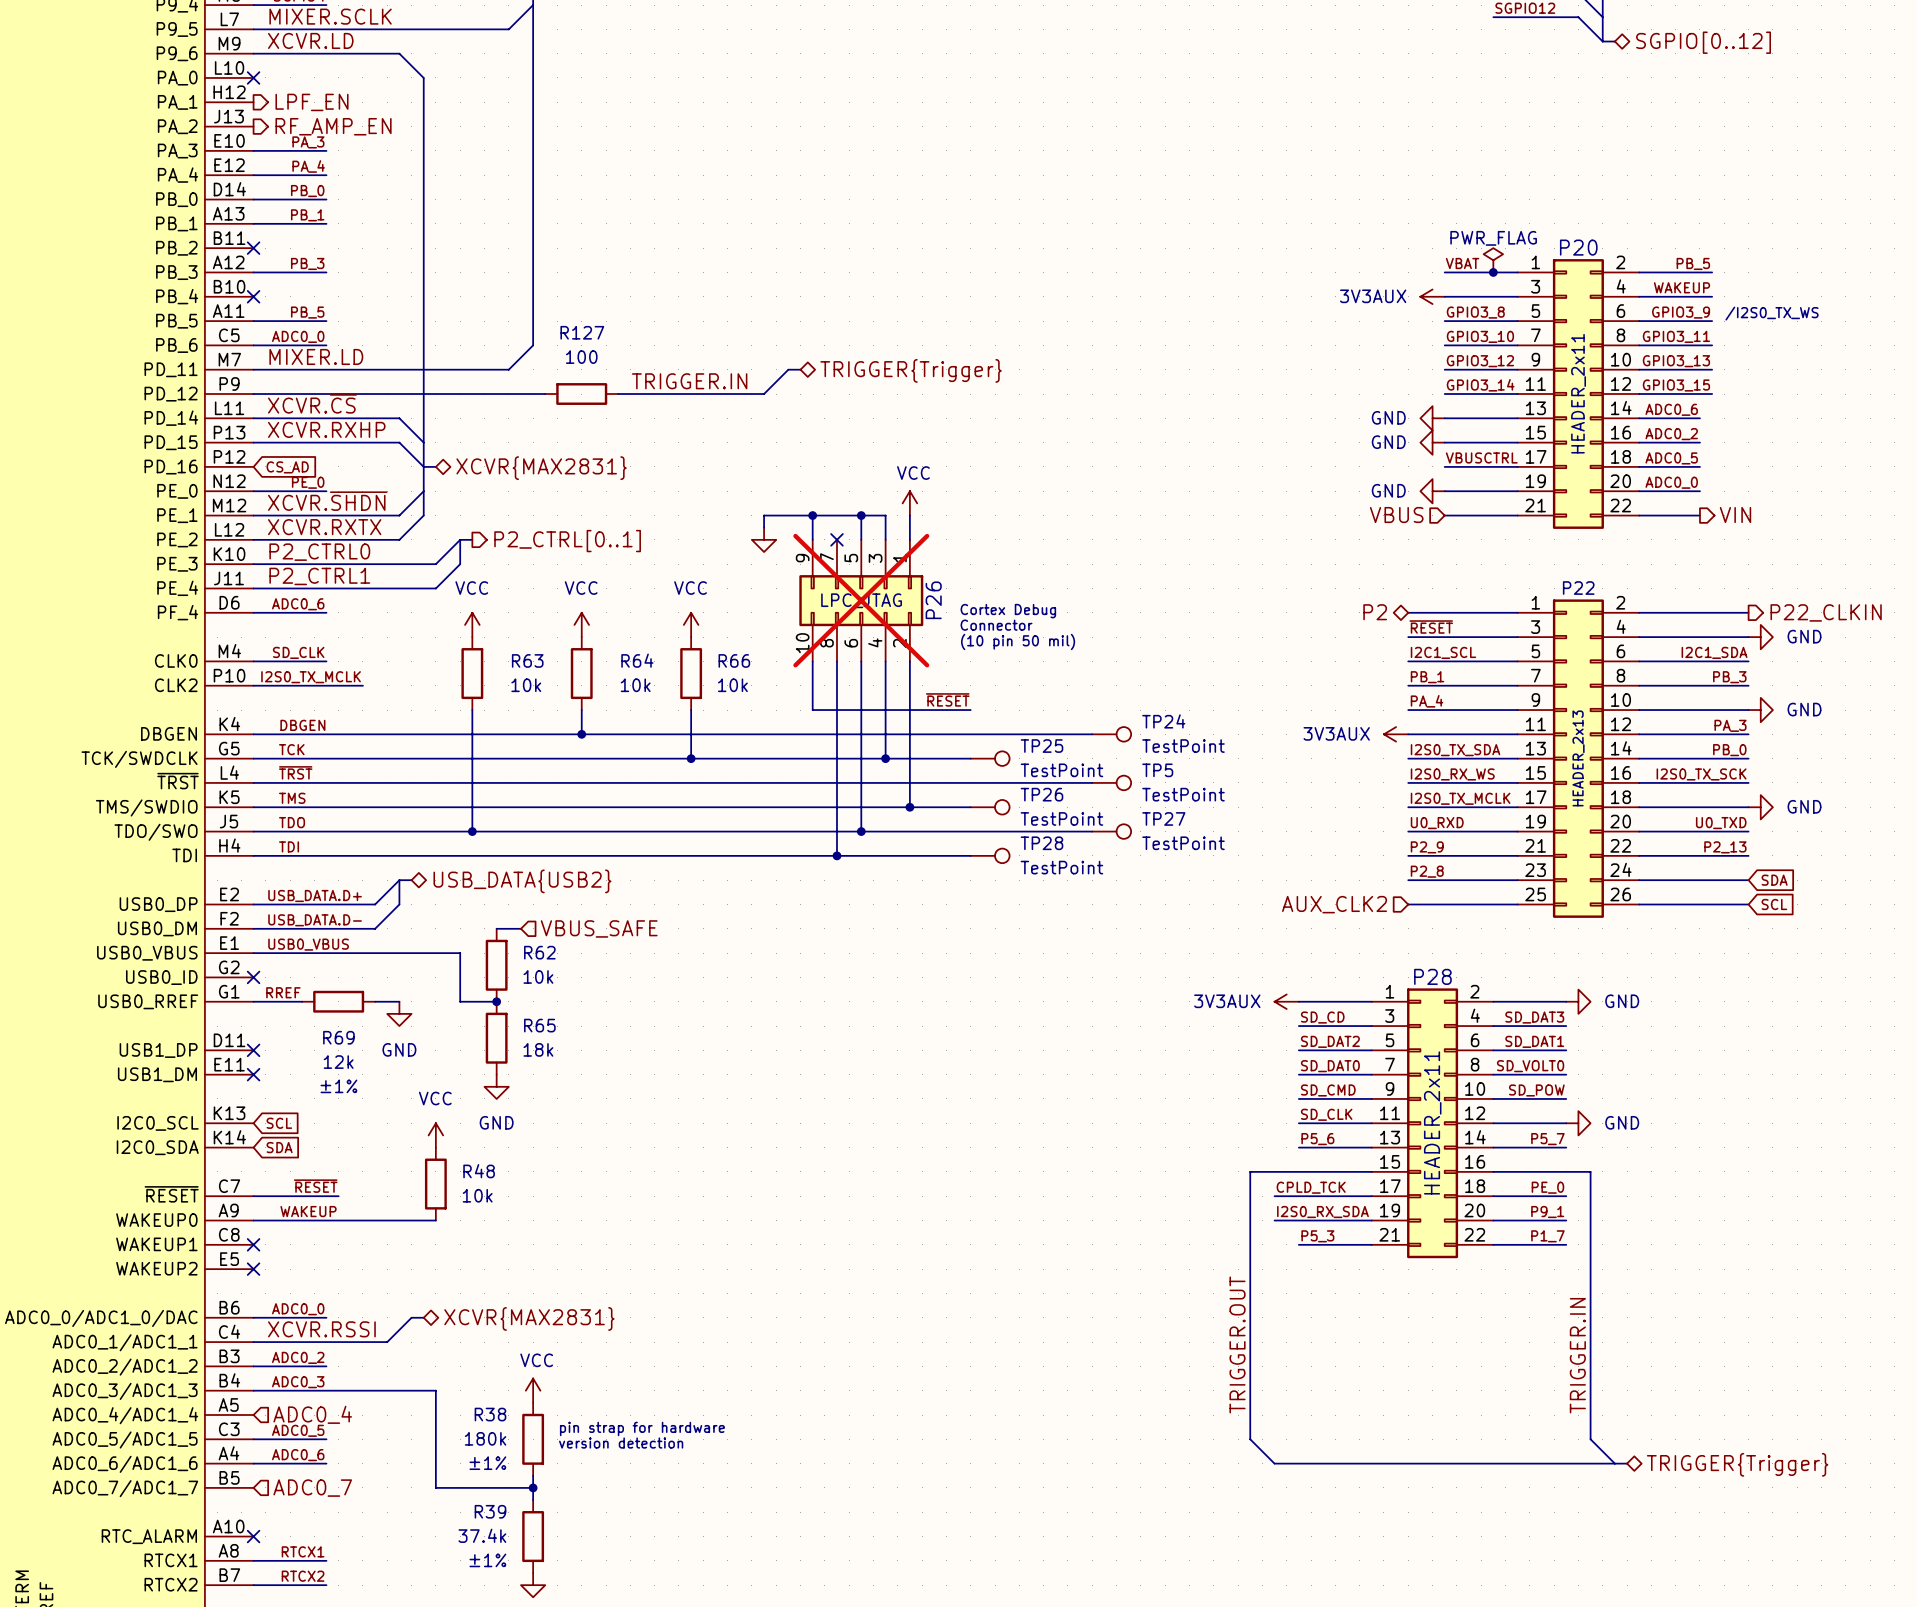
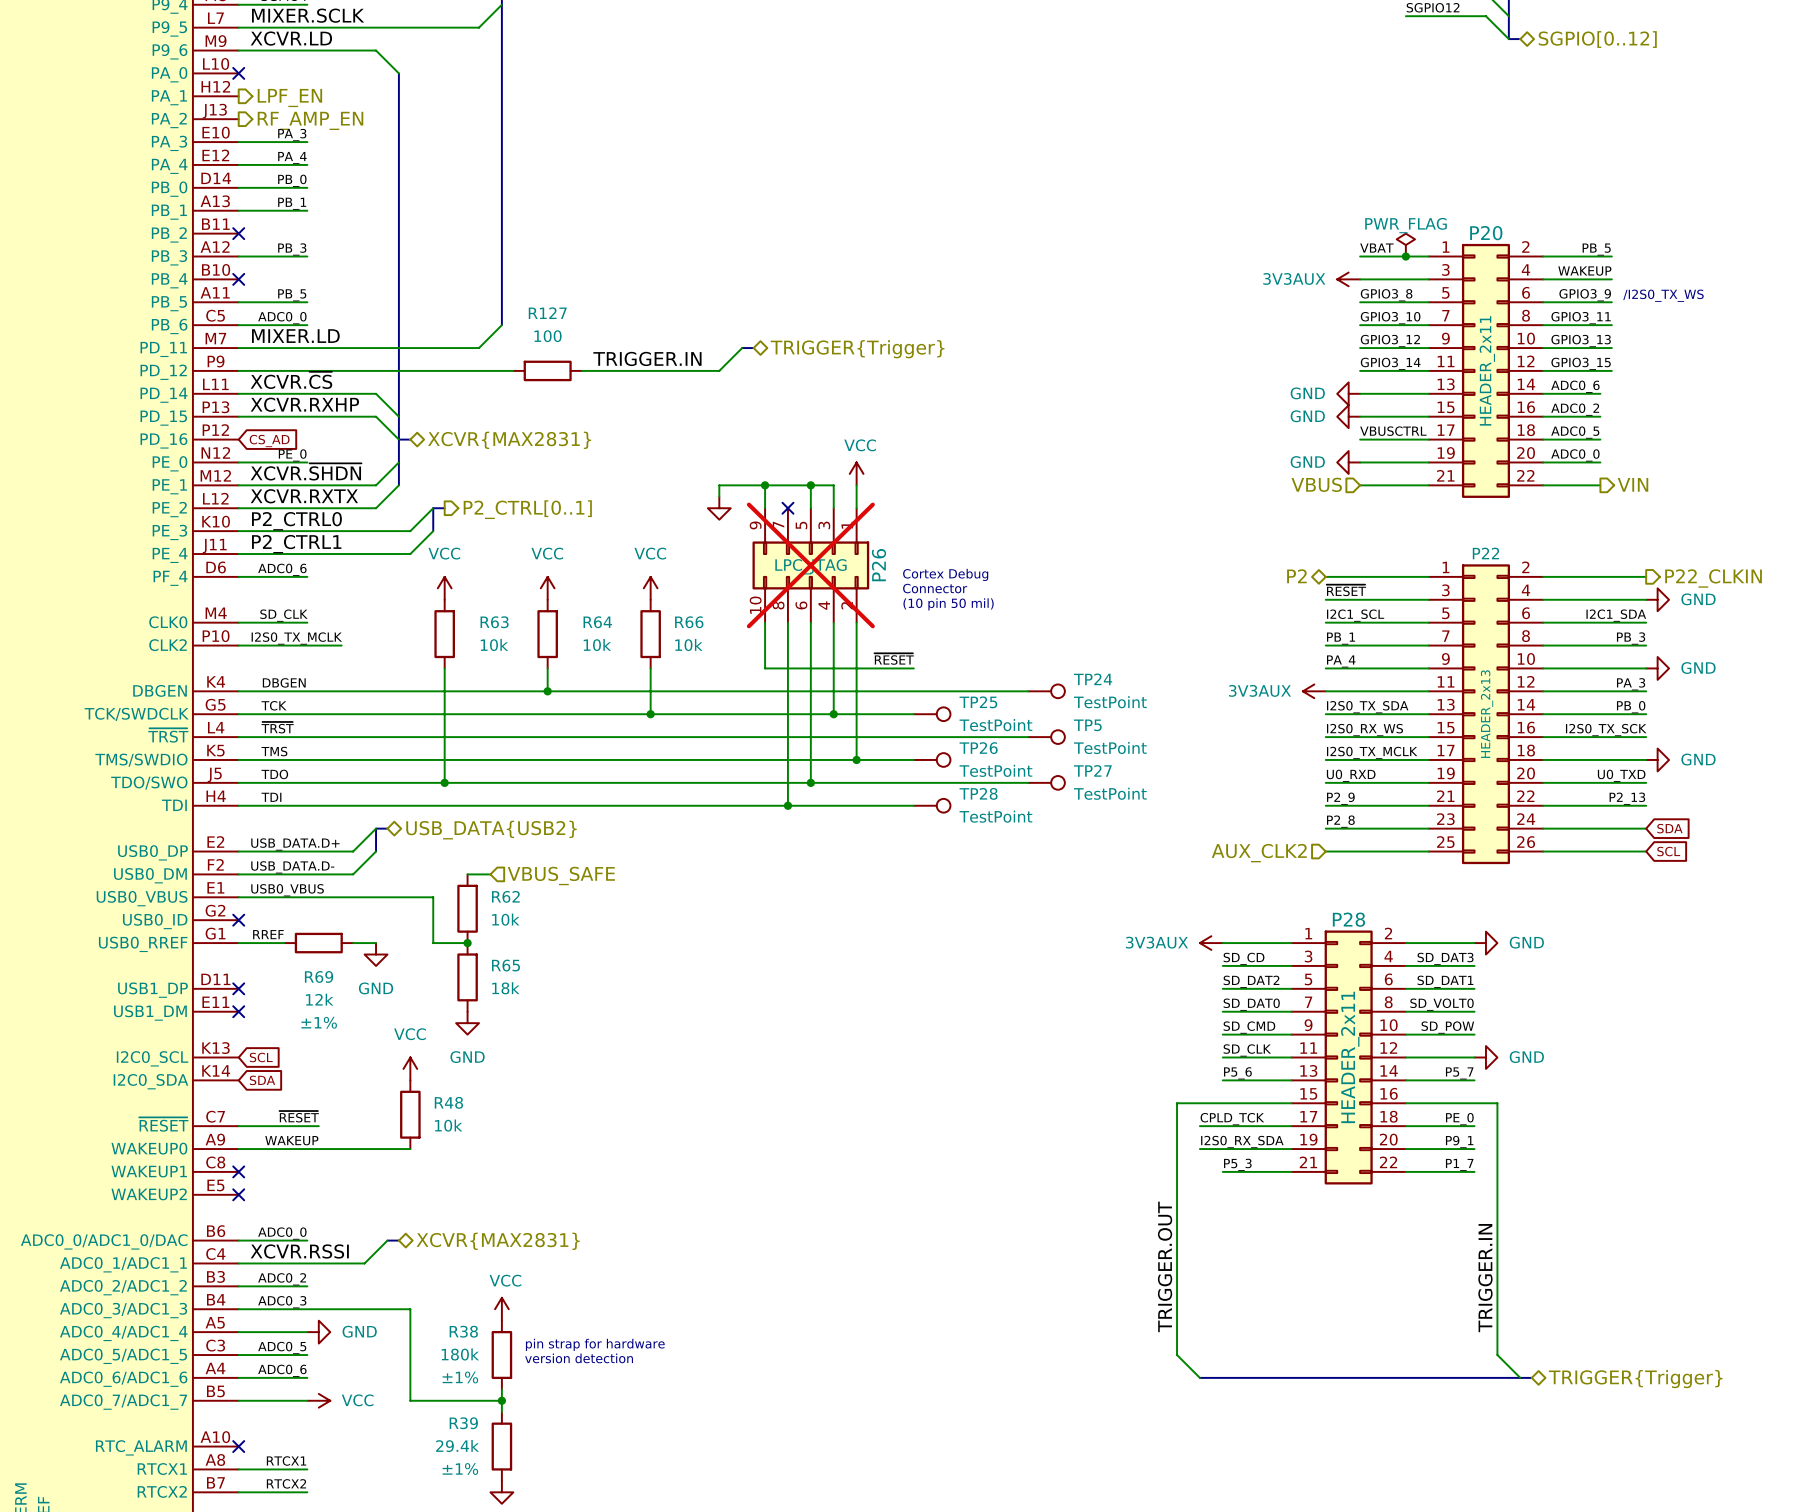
hierarchical label: ADC0_4 (312, 1414) -> none
wire: none -> (238, 1332) (307, 1332)
power symbol: none -> GND (318, 1332)
wire: none -> (238, 1400) (307, 1400)
power symbol: none -> VCC (318, 1400)
hierarchical label: ADC0_7 (312, 1488) -> none
R39 value: 37.4k (482, 1535) -> 29.4k (457, 1445)

